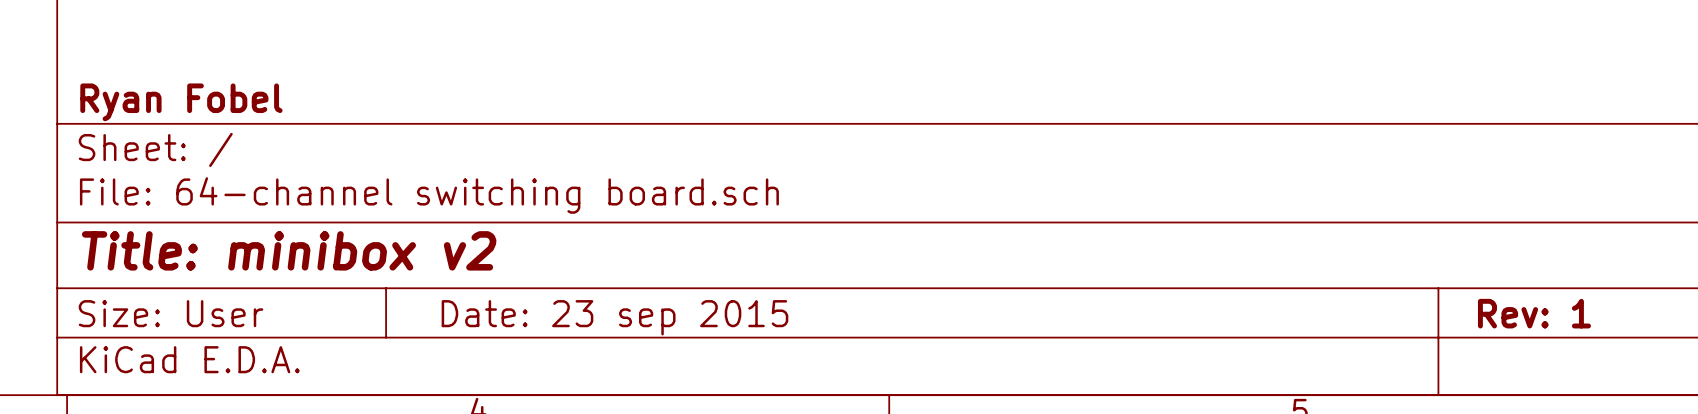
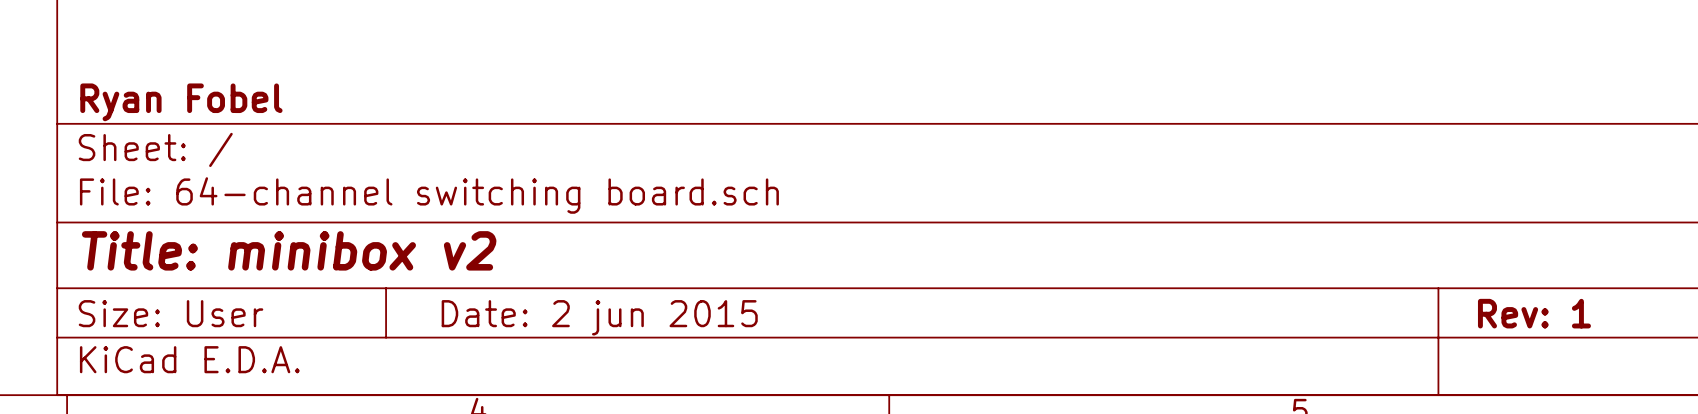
title block: Date: 23 sep 2015 (614, 317) -> Date: 2 jun 2015 (599, 317)

